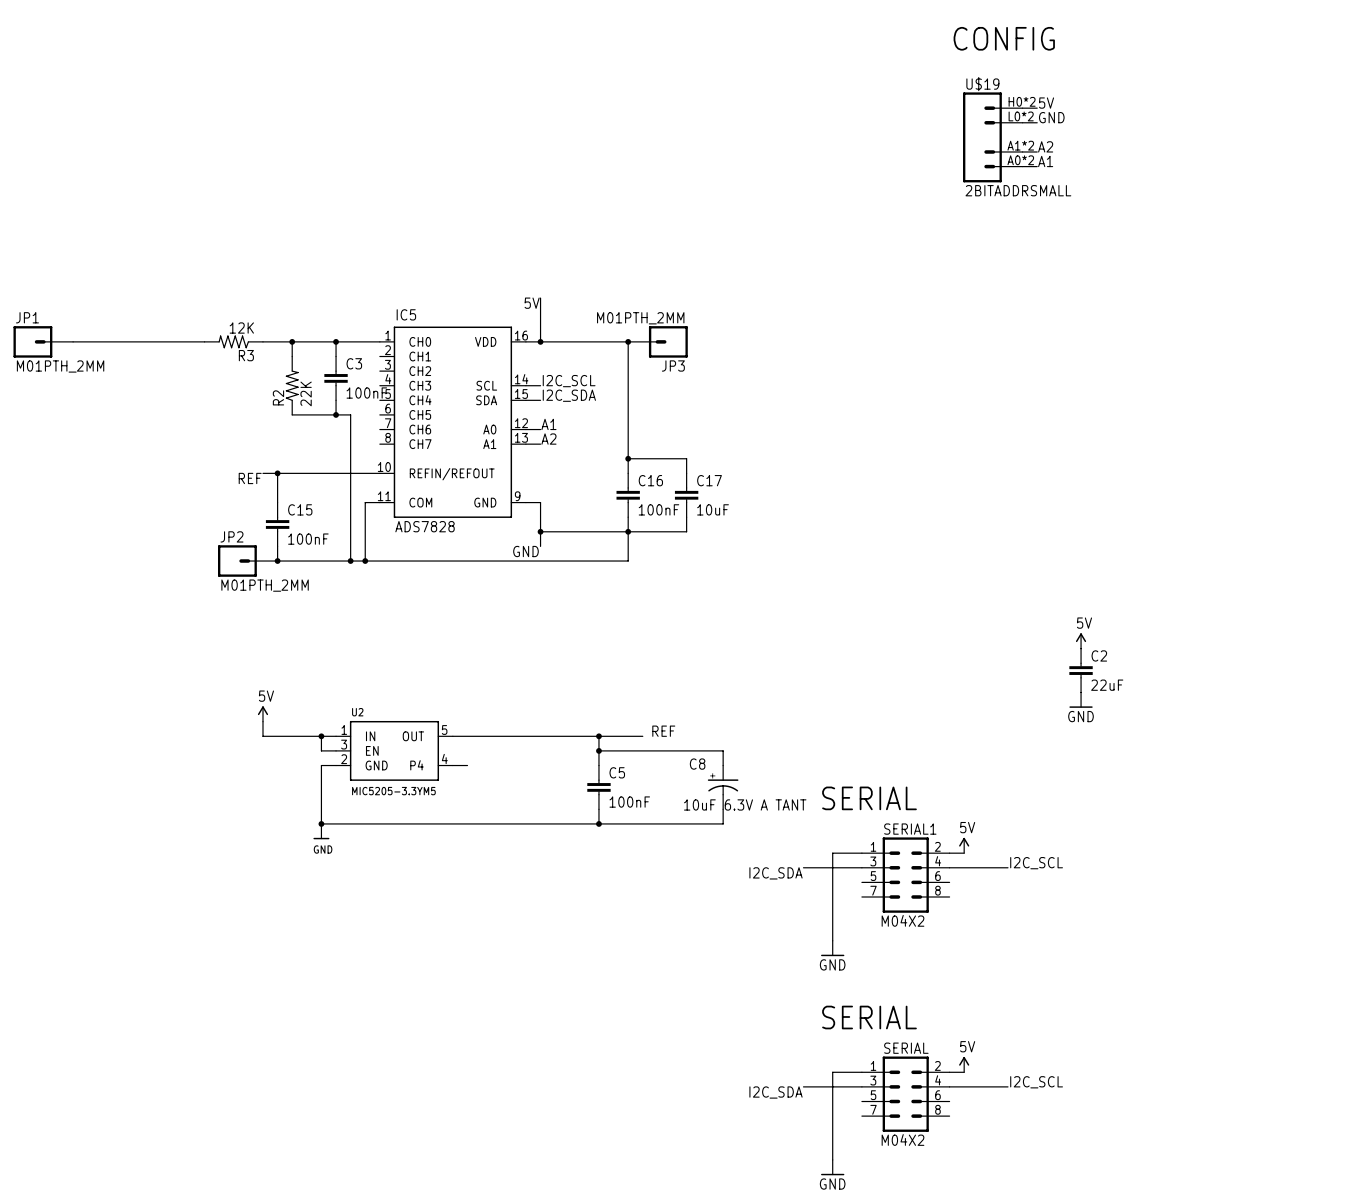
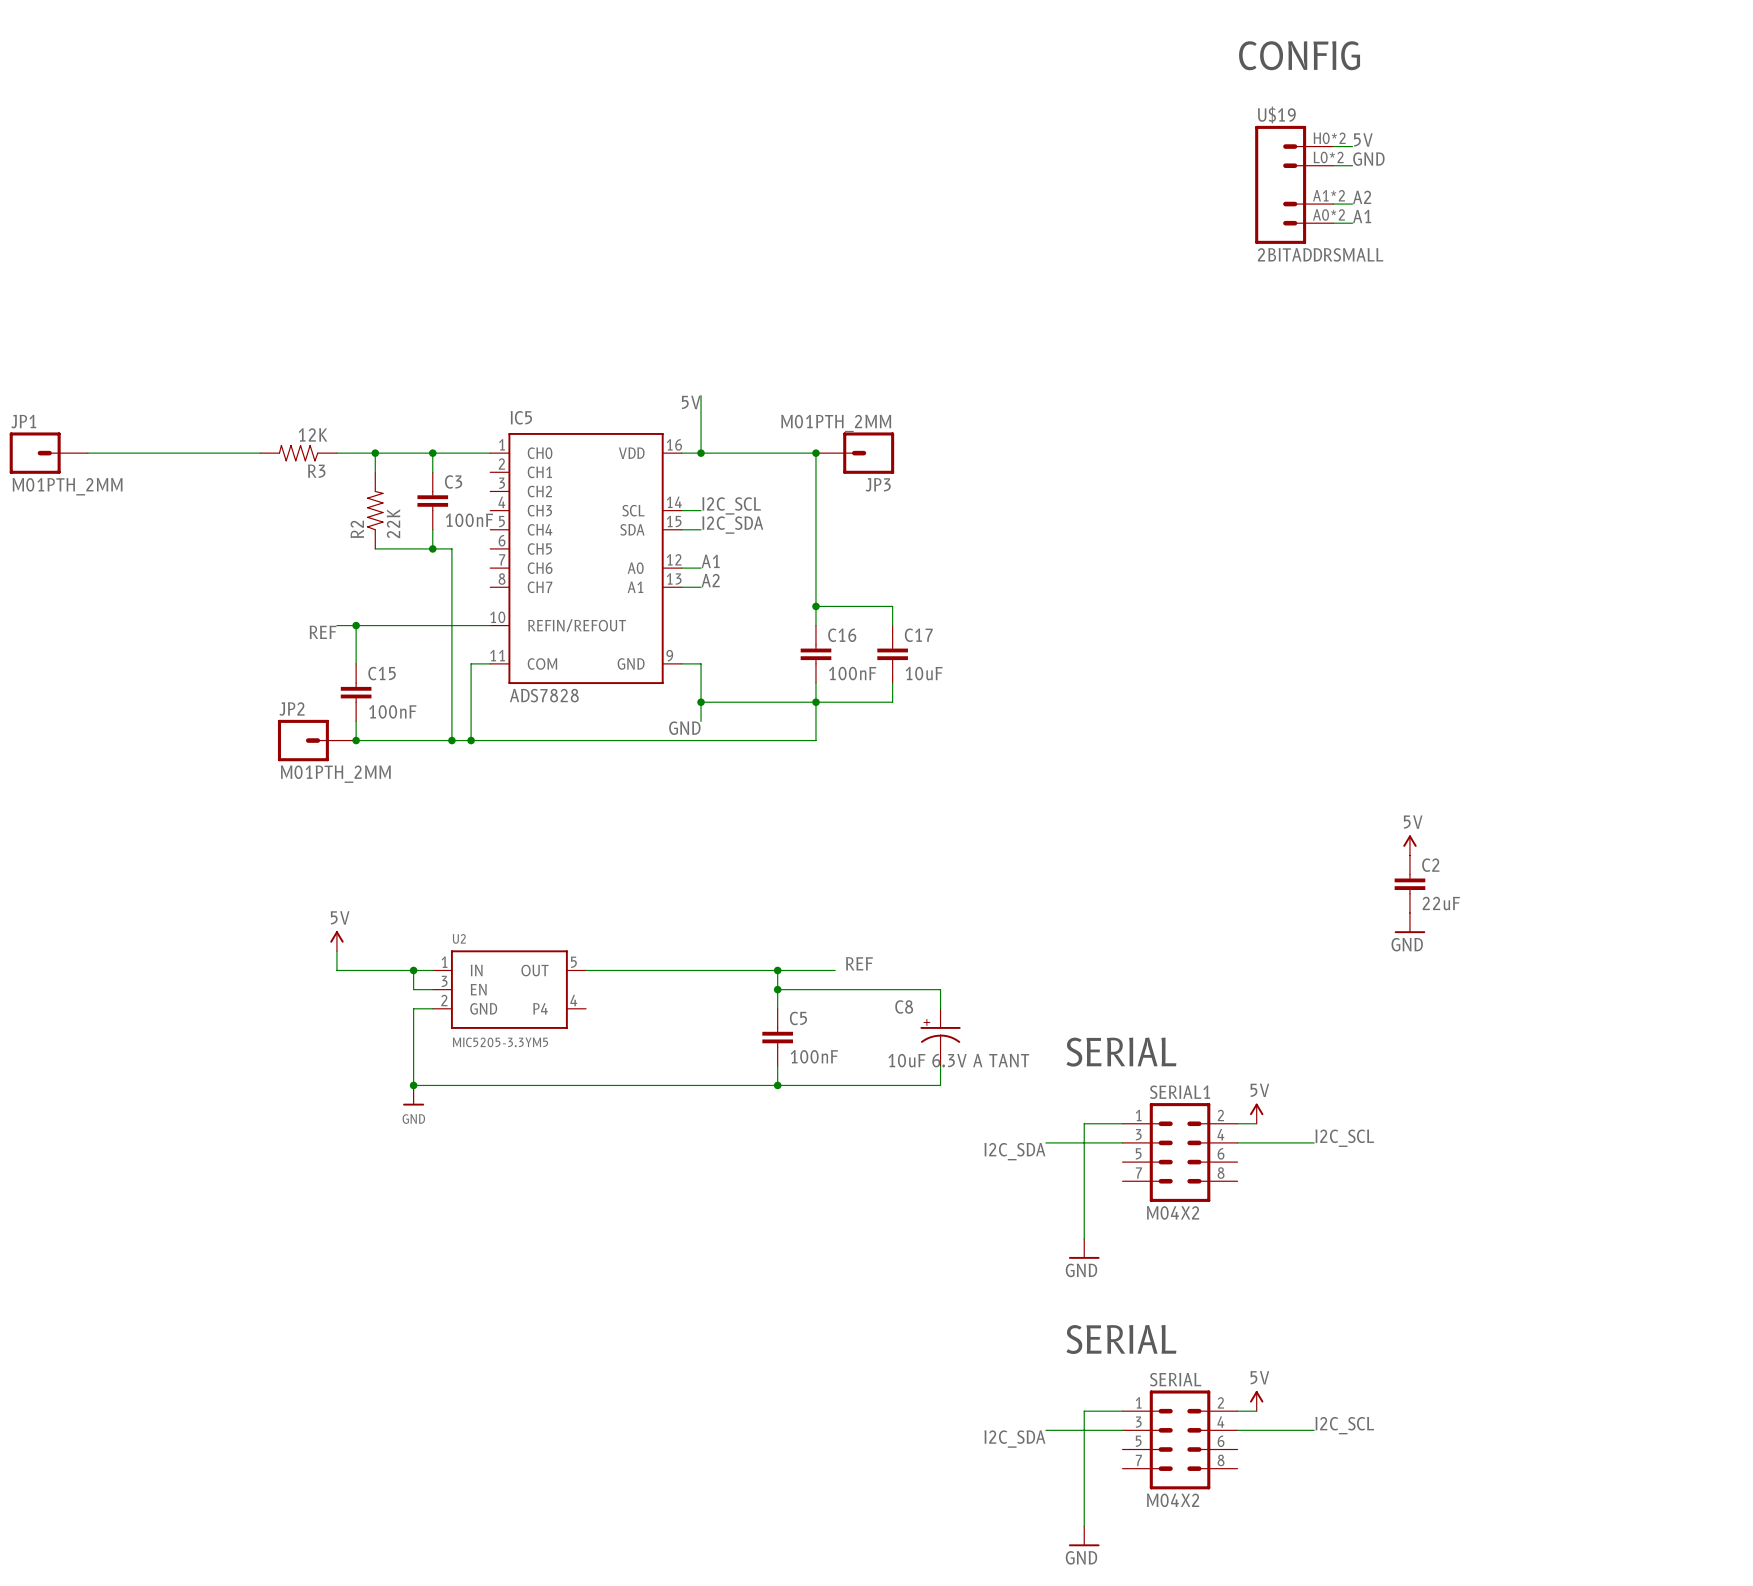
wire: (452, 765) (467, 765) -> none

